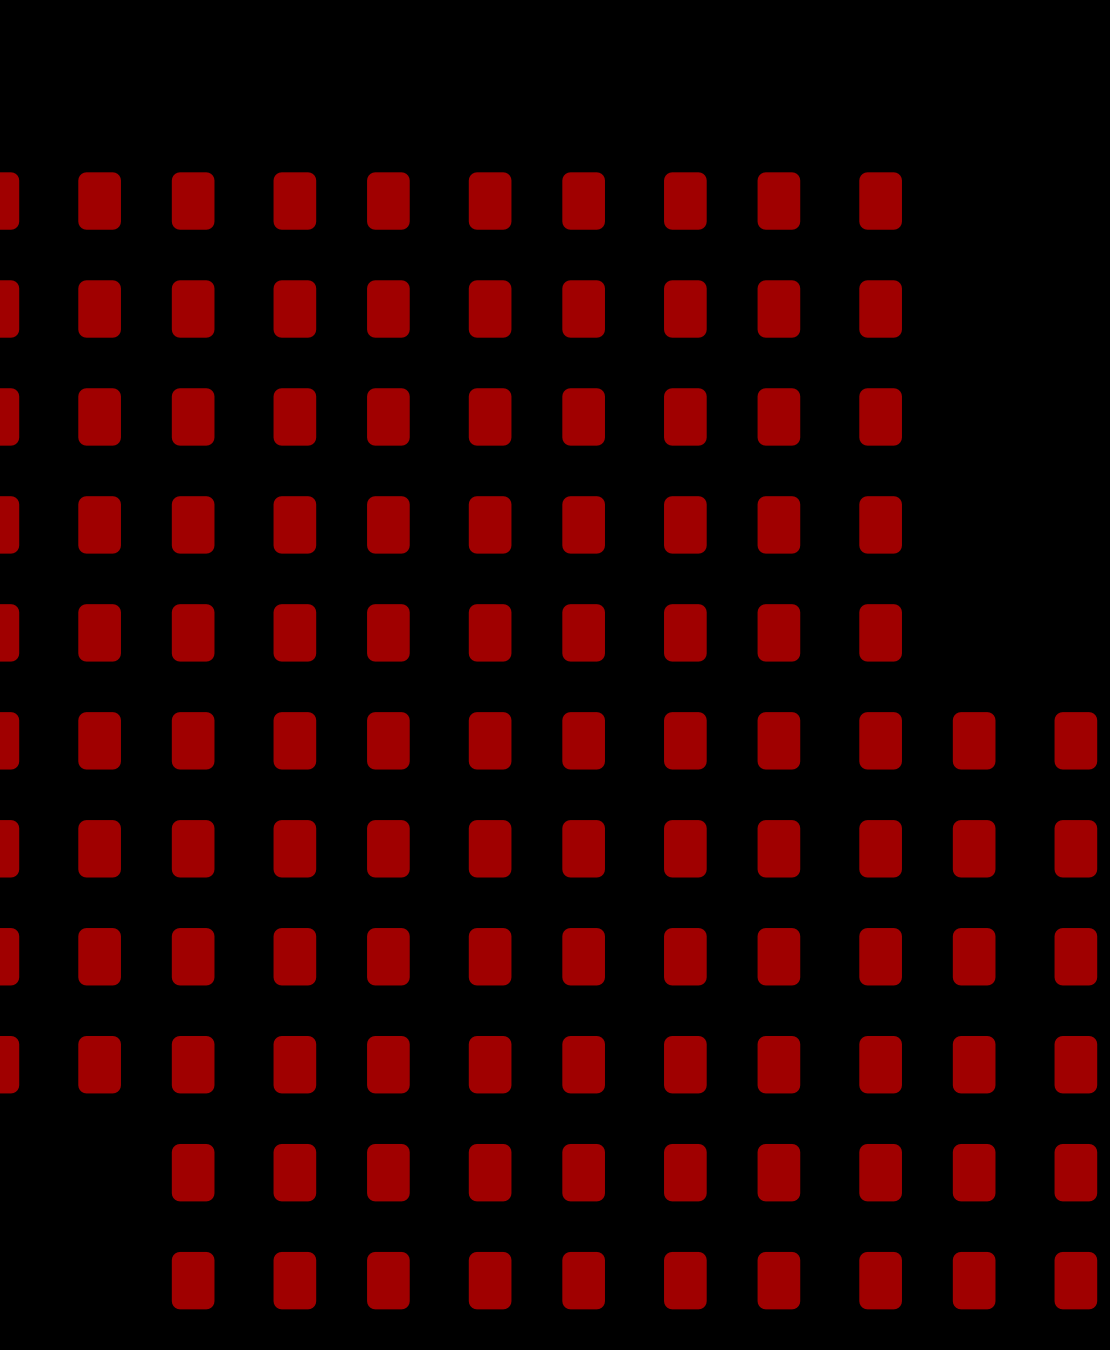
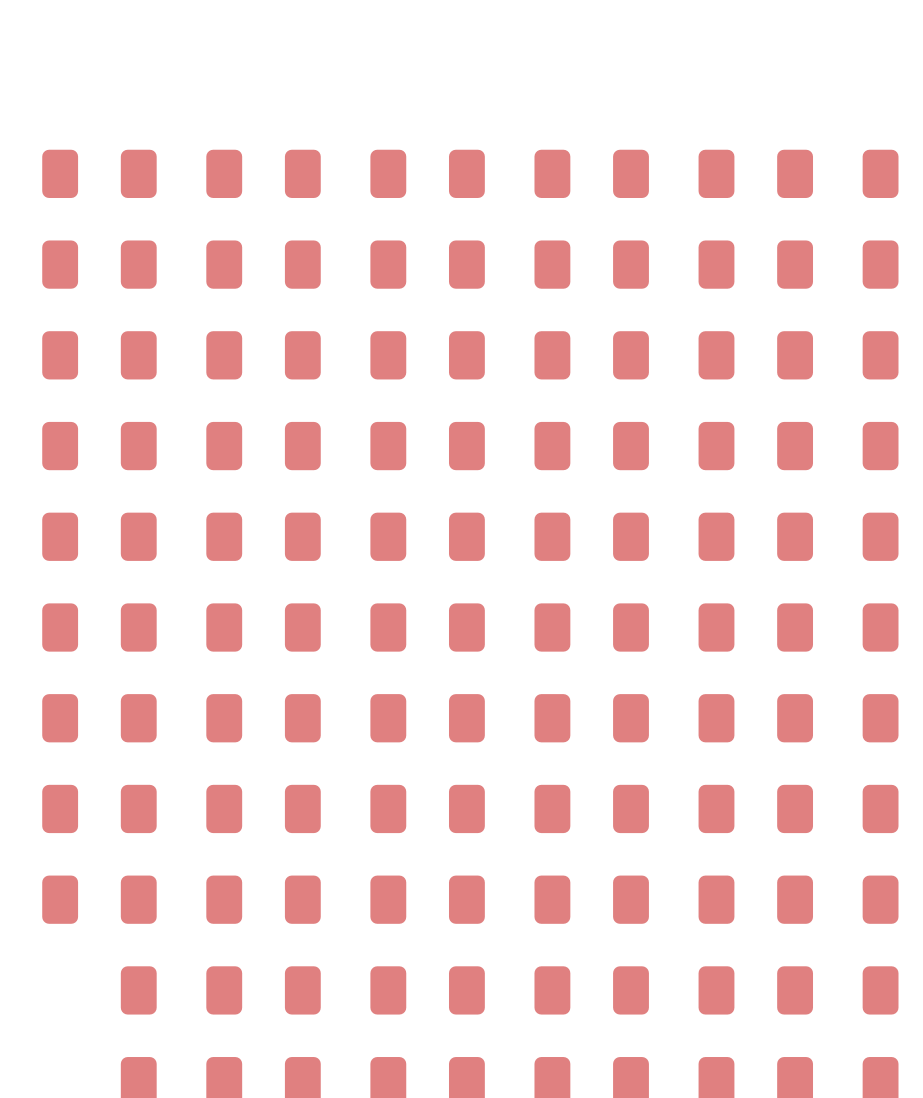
part: none -> (837, 173)
part: none -> (837, 264)
part: none -> (837, 355)
part: none -> (837, 446)
part: none -> (837, 536)

